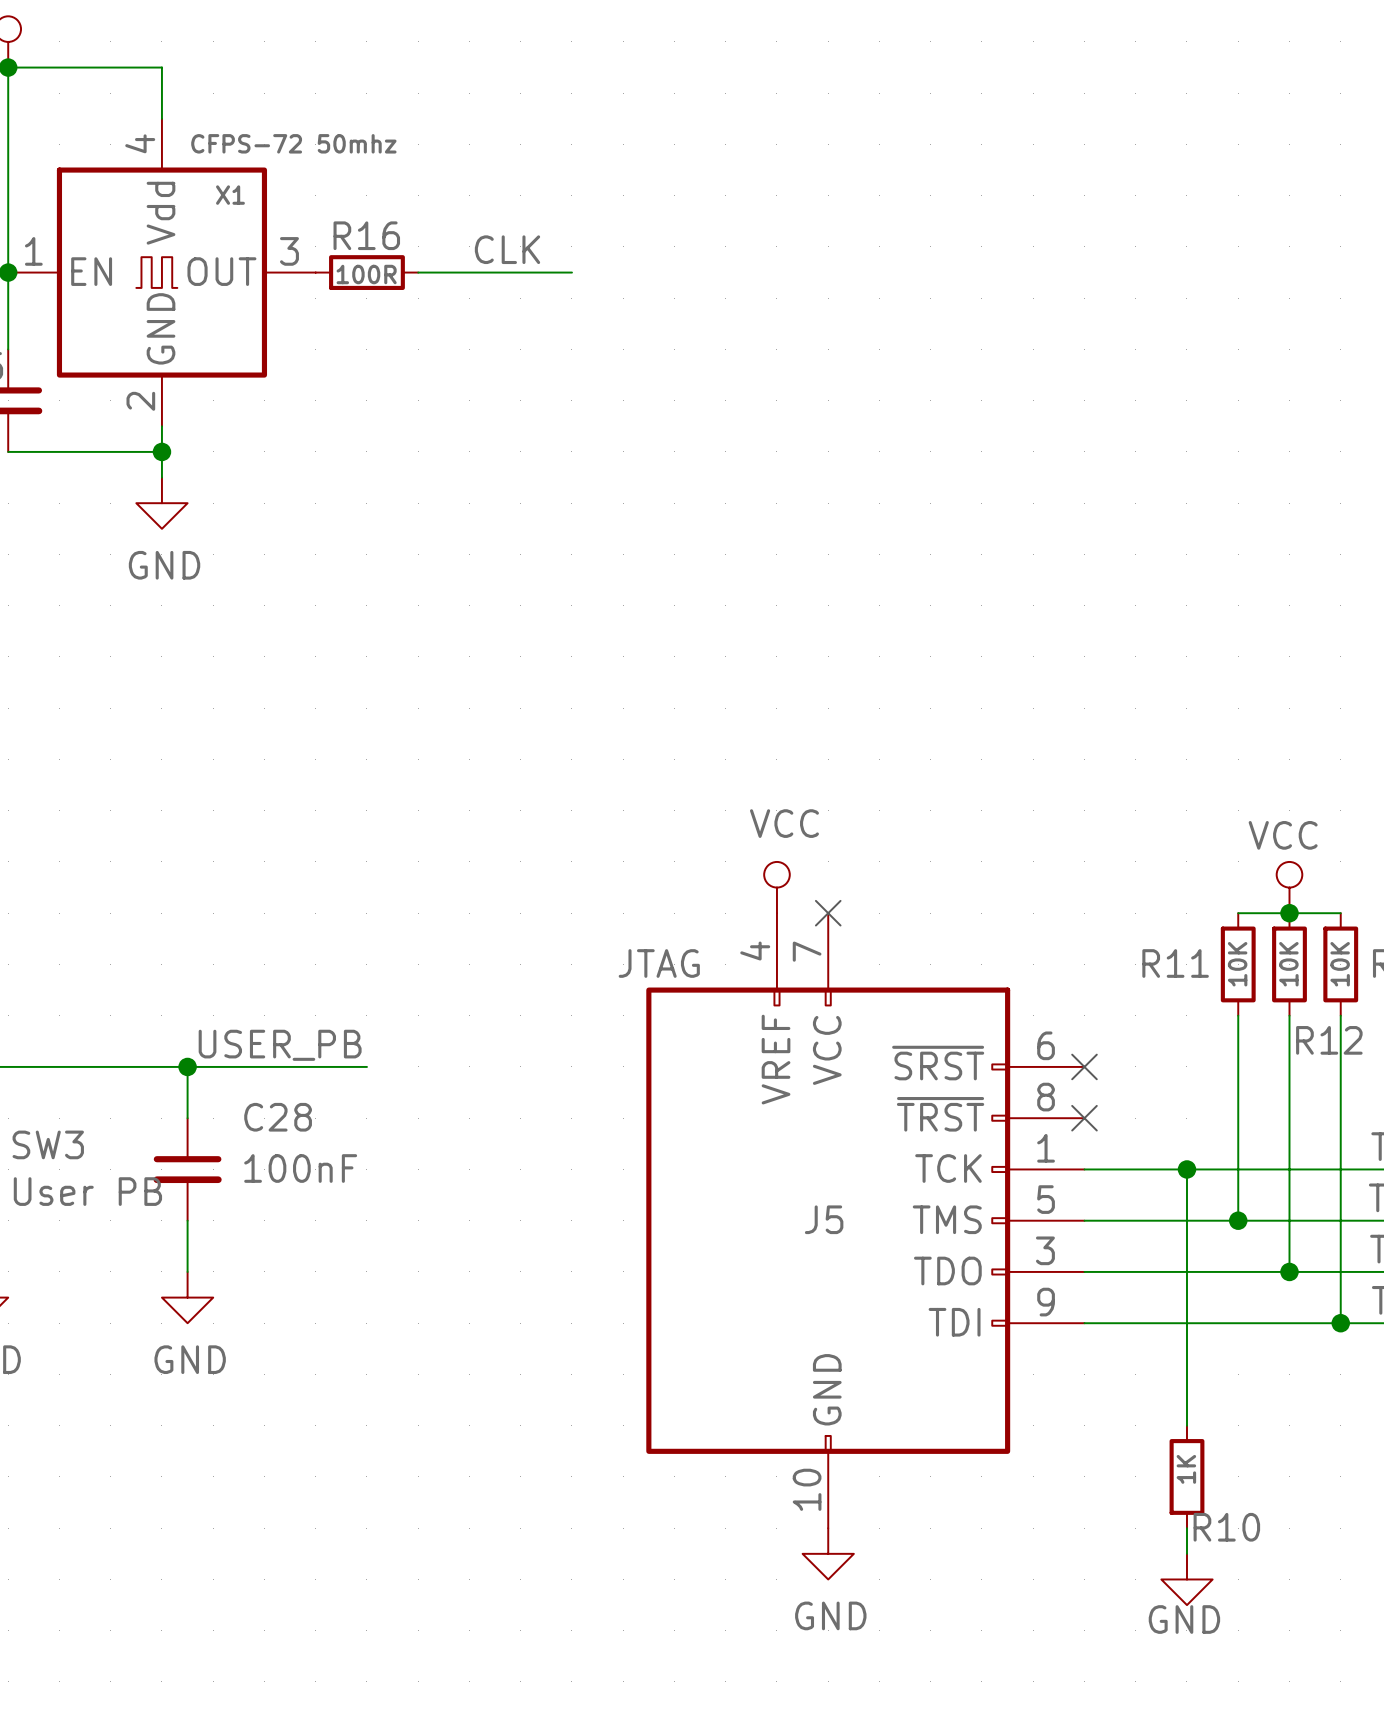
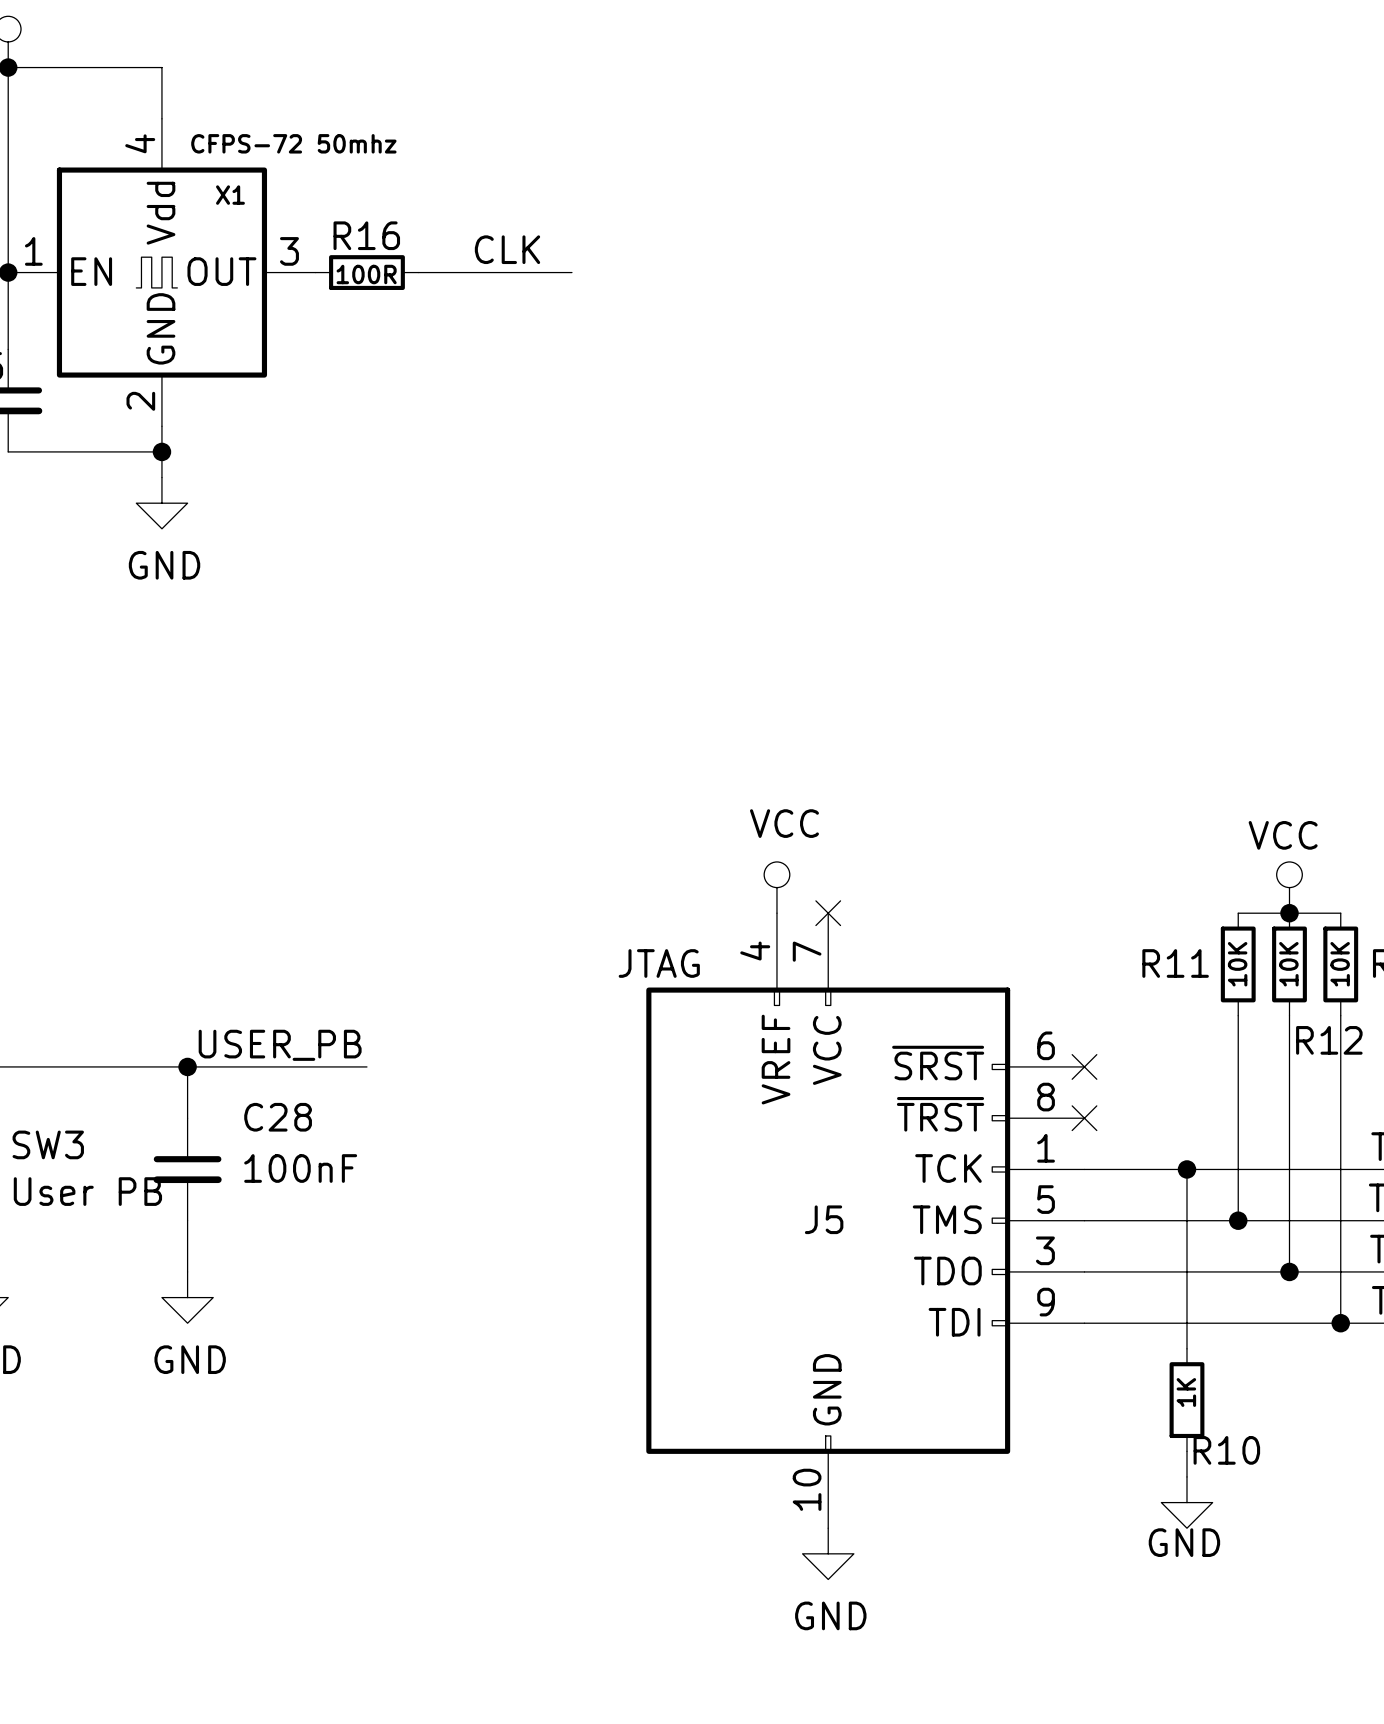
wire: (1186, 1348) (1186, 1425) -> none
R10 position: (1186, 1476) -> (1186, 1400)
wire: (1186, 1528) (1186, 1553) -> (1186, 1451) (1186, 1476)
power symbol position: GND (1186, 1579) -> GND (1186, 1502)

